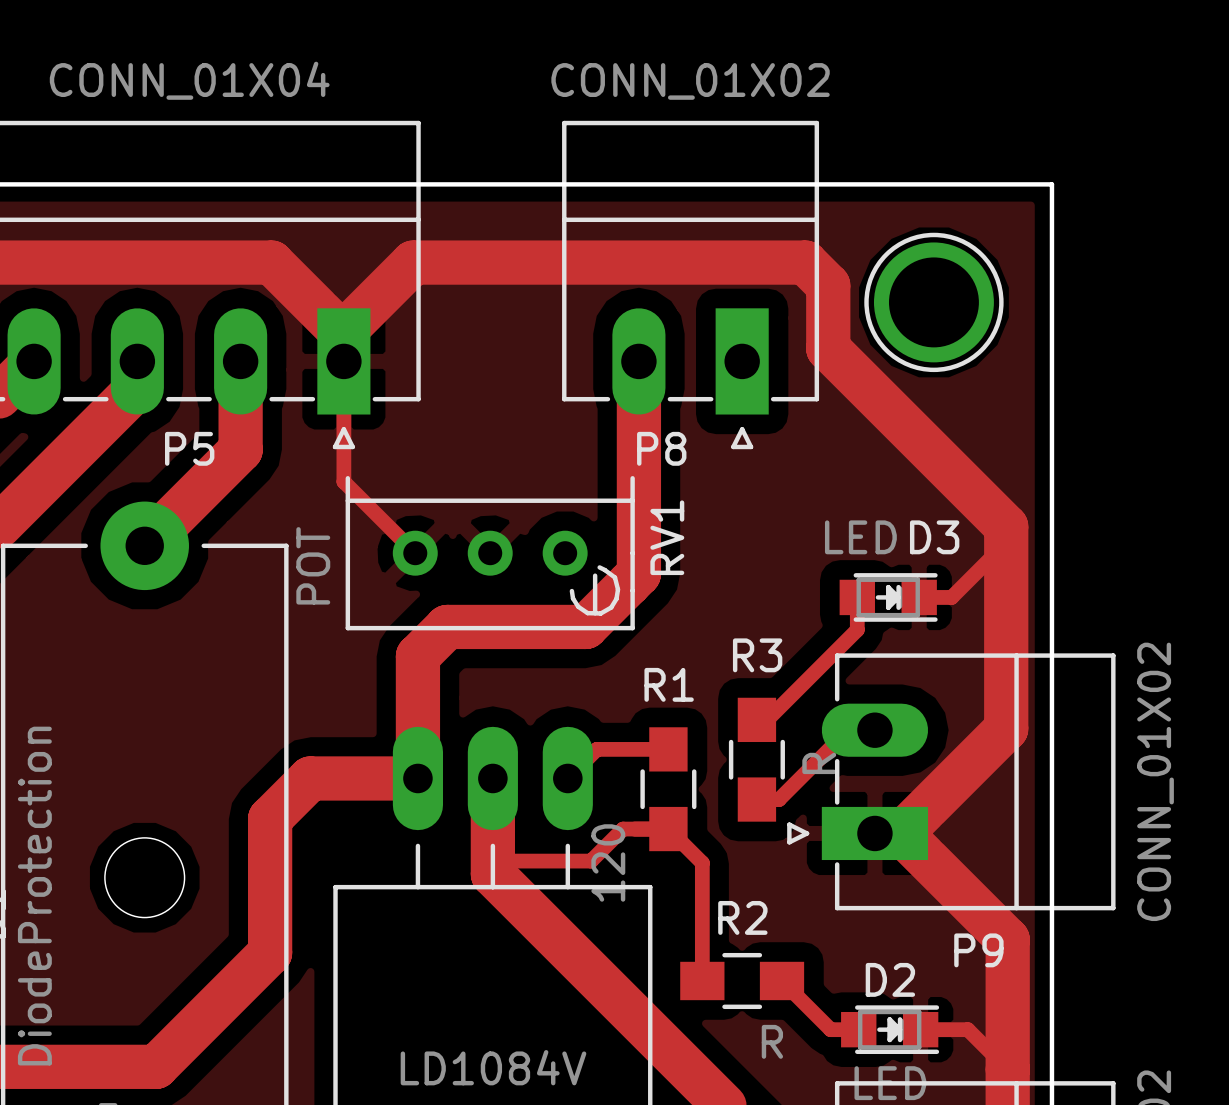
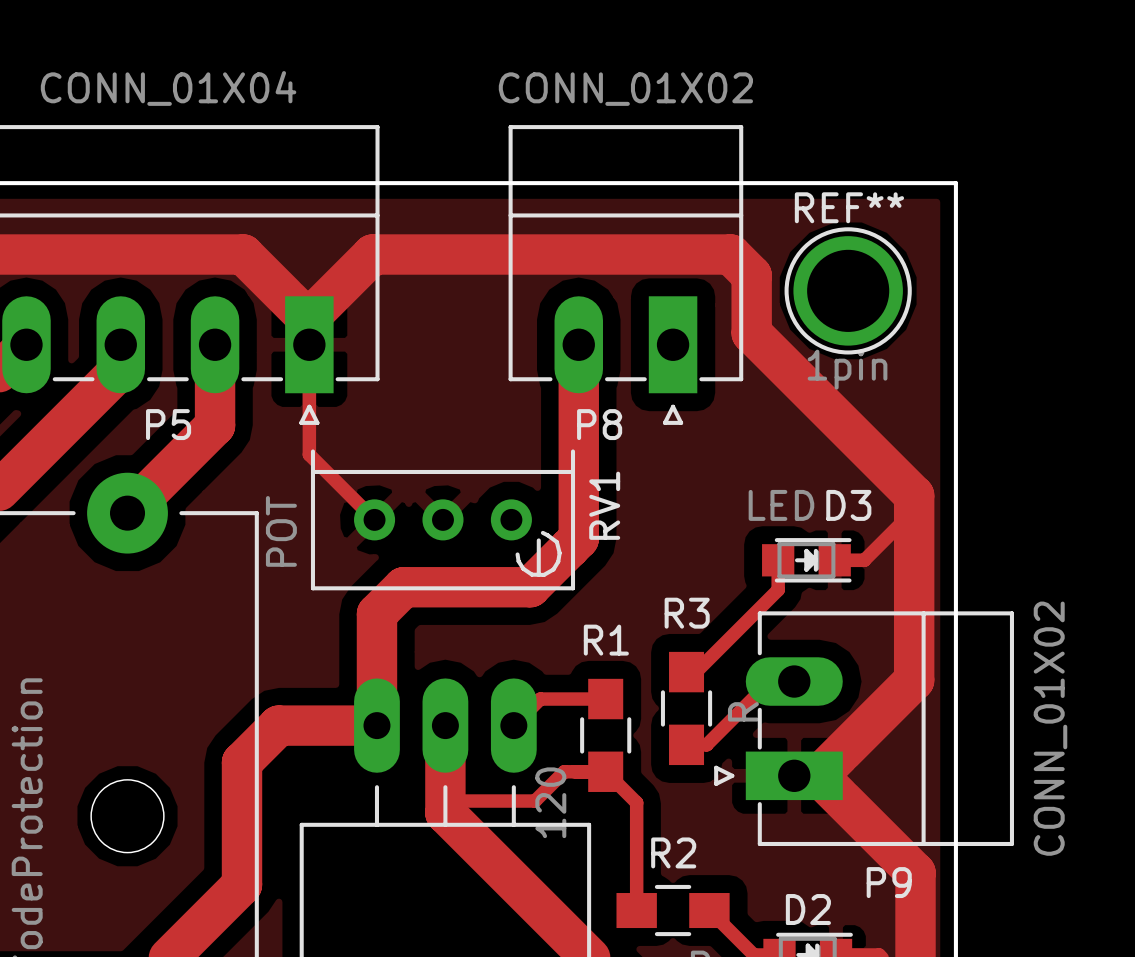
REF** name: none -> REF** (849, 207)
REF** value: none -> 1pin (847, 369)

